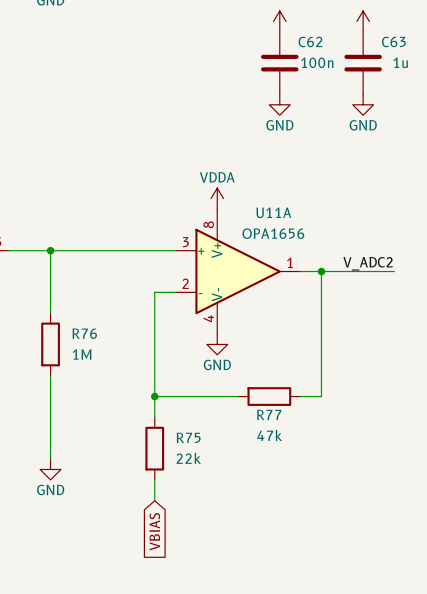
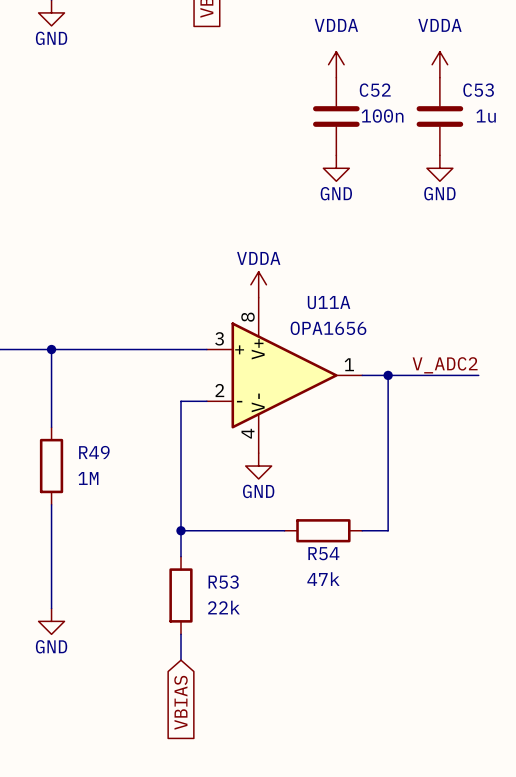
C62 name: C62 (310, 41) -> C52 (375, 90)
C63 name: C63 (393, 41) -> C53 (478, 90)
R76 name: R76 (84, 333) -> R49 (94, 452)
R77 name: R77 (269, 414) -> R54 (323, 553)
R75 name: R75 (188, 437) -> R53 (223, 582)

